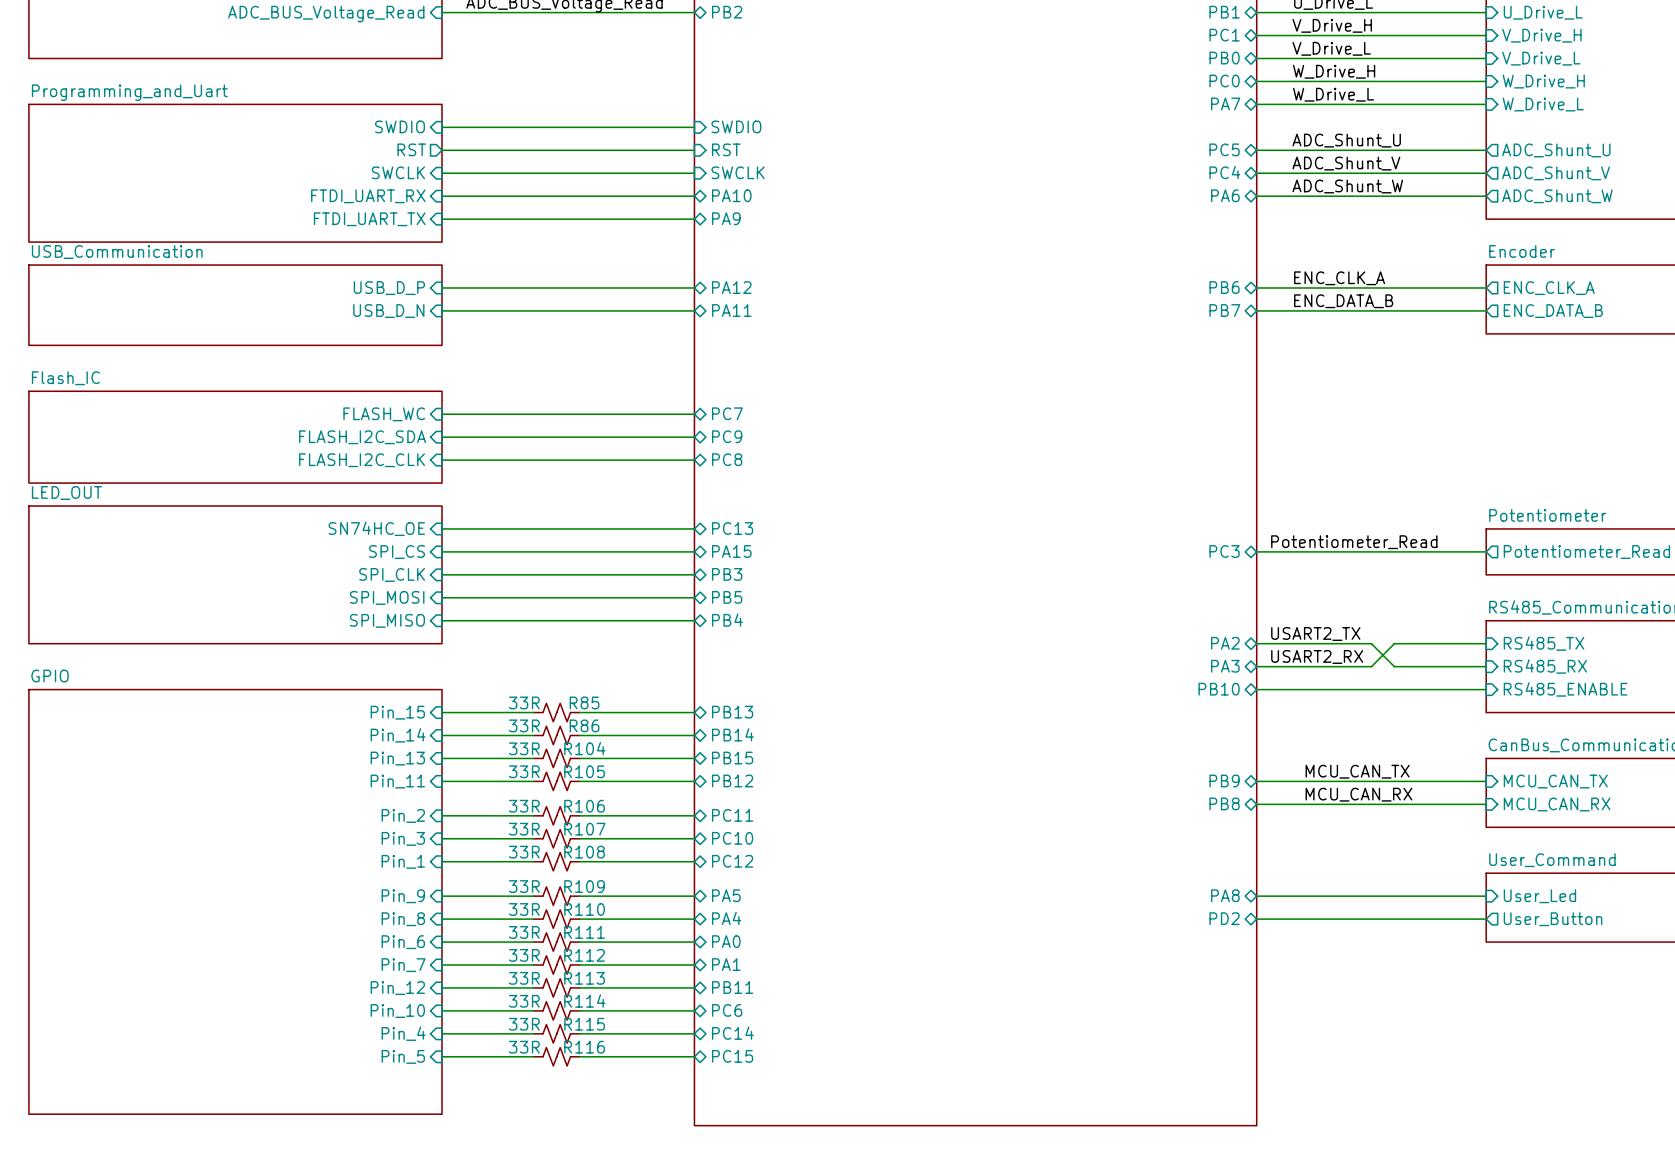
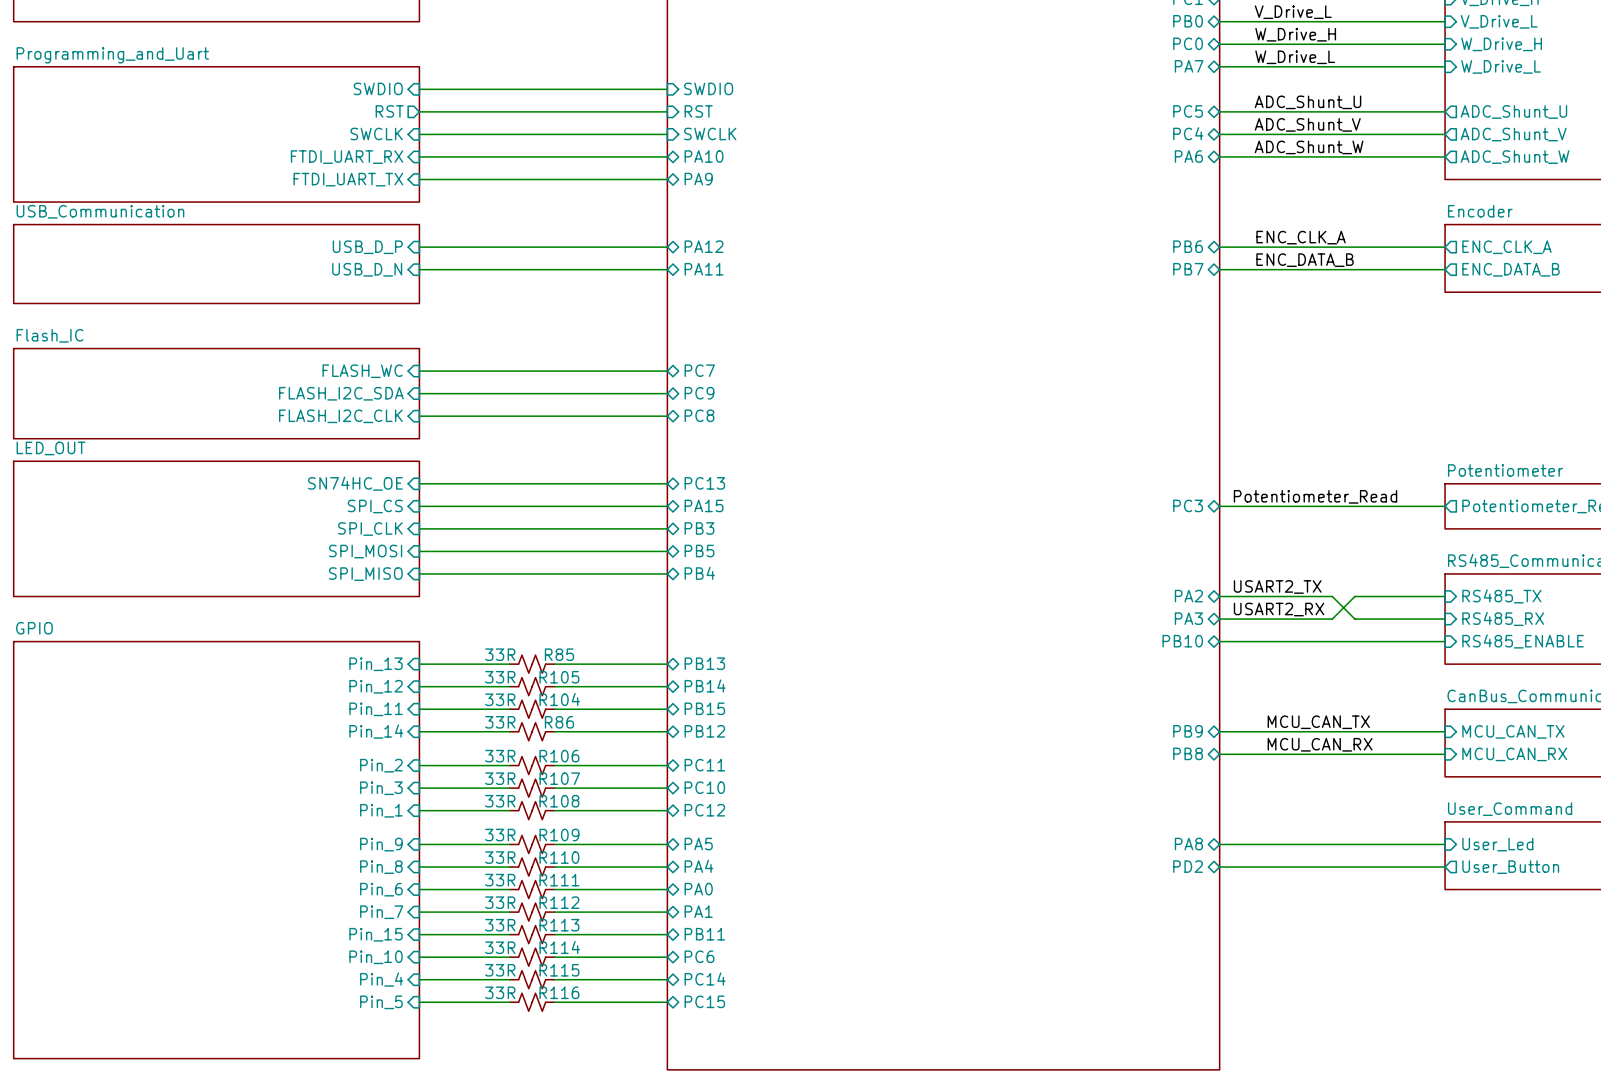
sheet pin: Pin_15 (397, 712) -> Pin_13 (376, 664)
R86 name: R86 (584, 725) -> R105 (559, 677)
sheet pin: Pin_14 (398, 735) -> Pin_12 (376, 686)
sheet pin: Pin_13 (397, 758) -> Pin_11 (376, 709)
R105 name: R105 (584, 771) -> R86 (559, 722)
sheet pin: Pin_11 (397, 781) -> Pin_14 (376, 731)
sheet pin: Pin_12 (397, 988) -> Pin_15 (376, 934)

